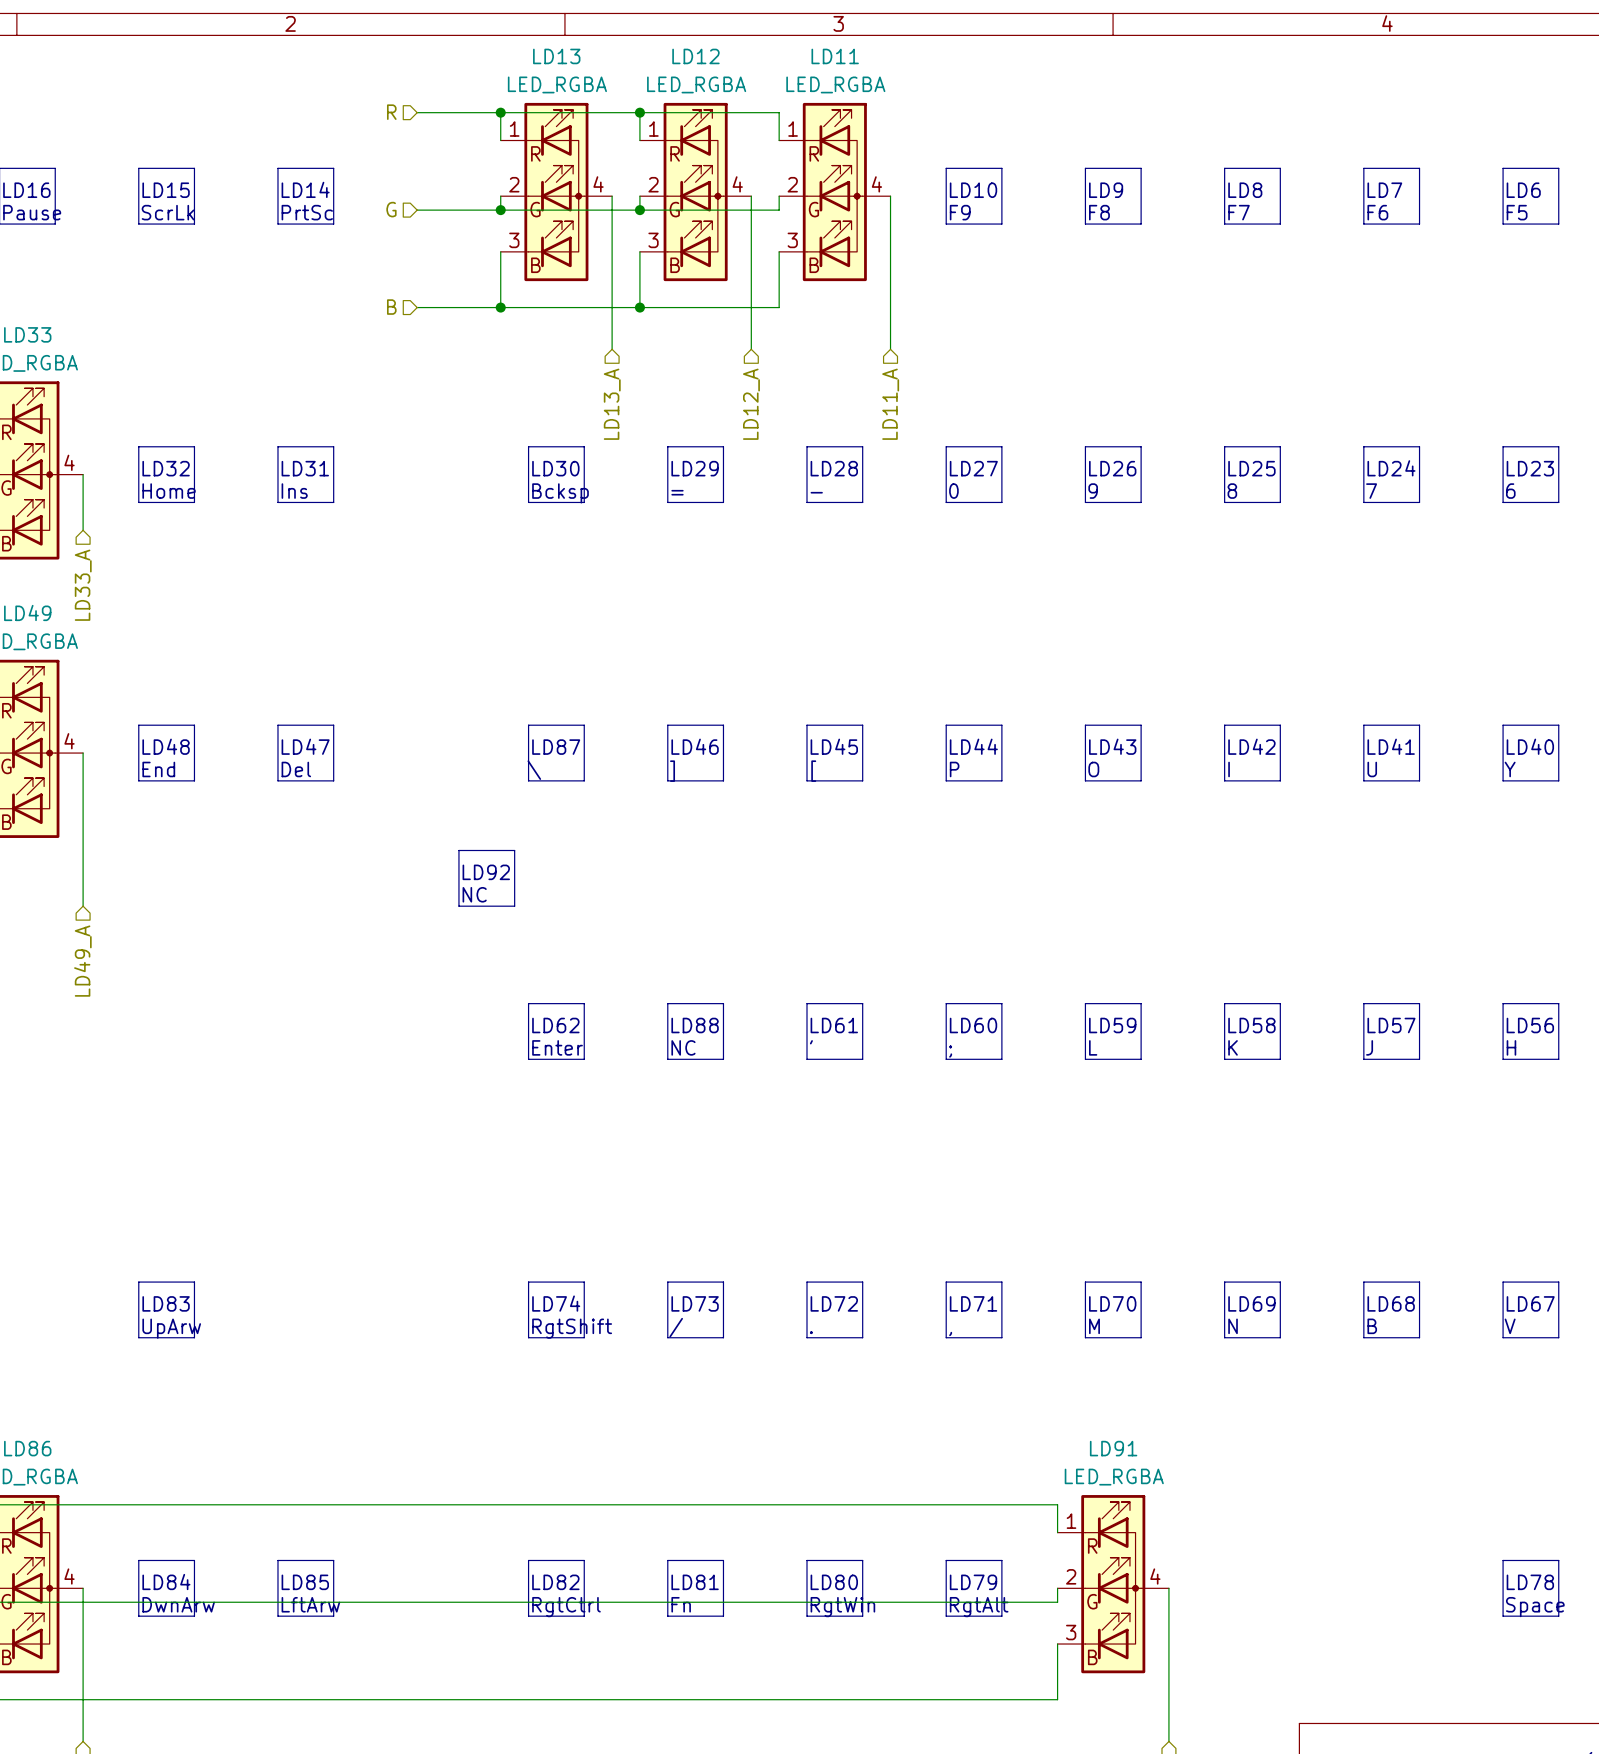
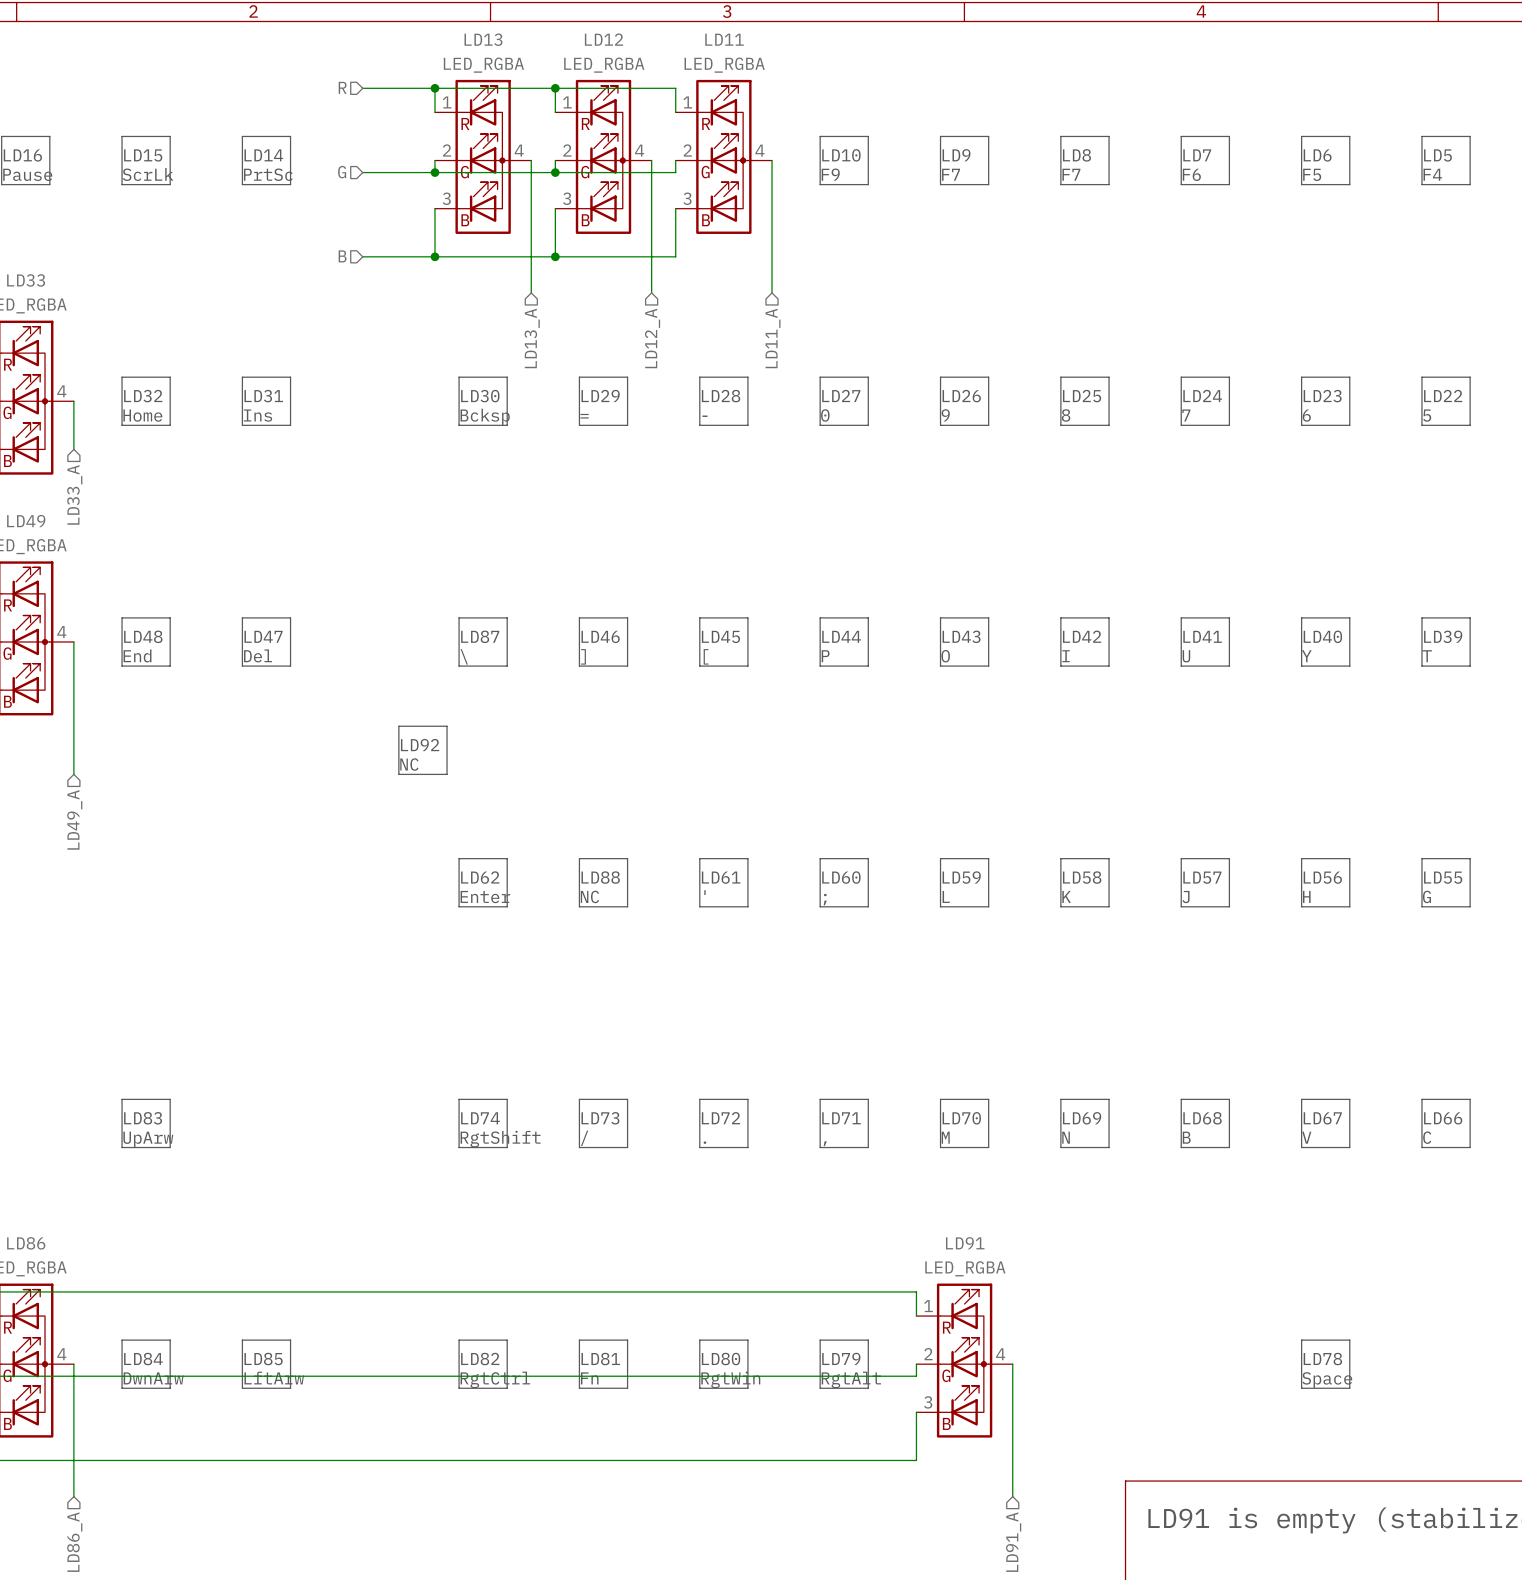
text: F8 (1099, 212) -> F7 (951, 174)

